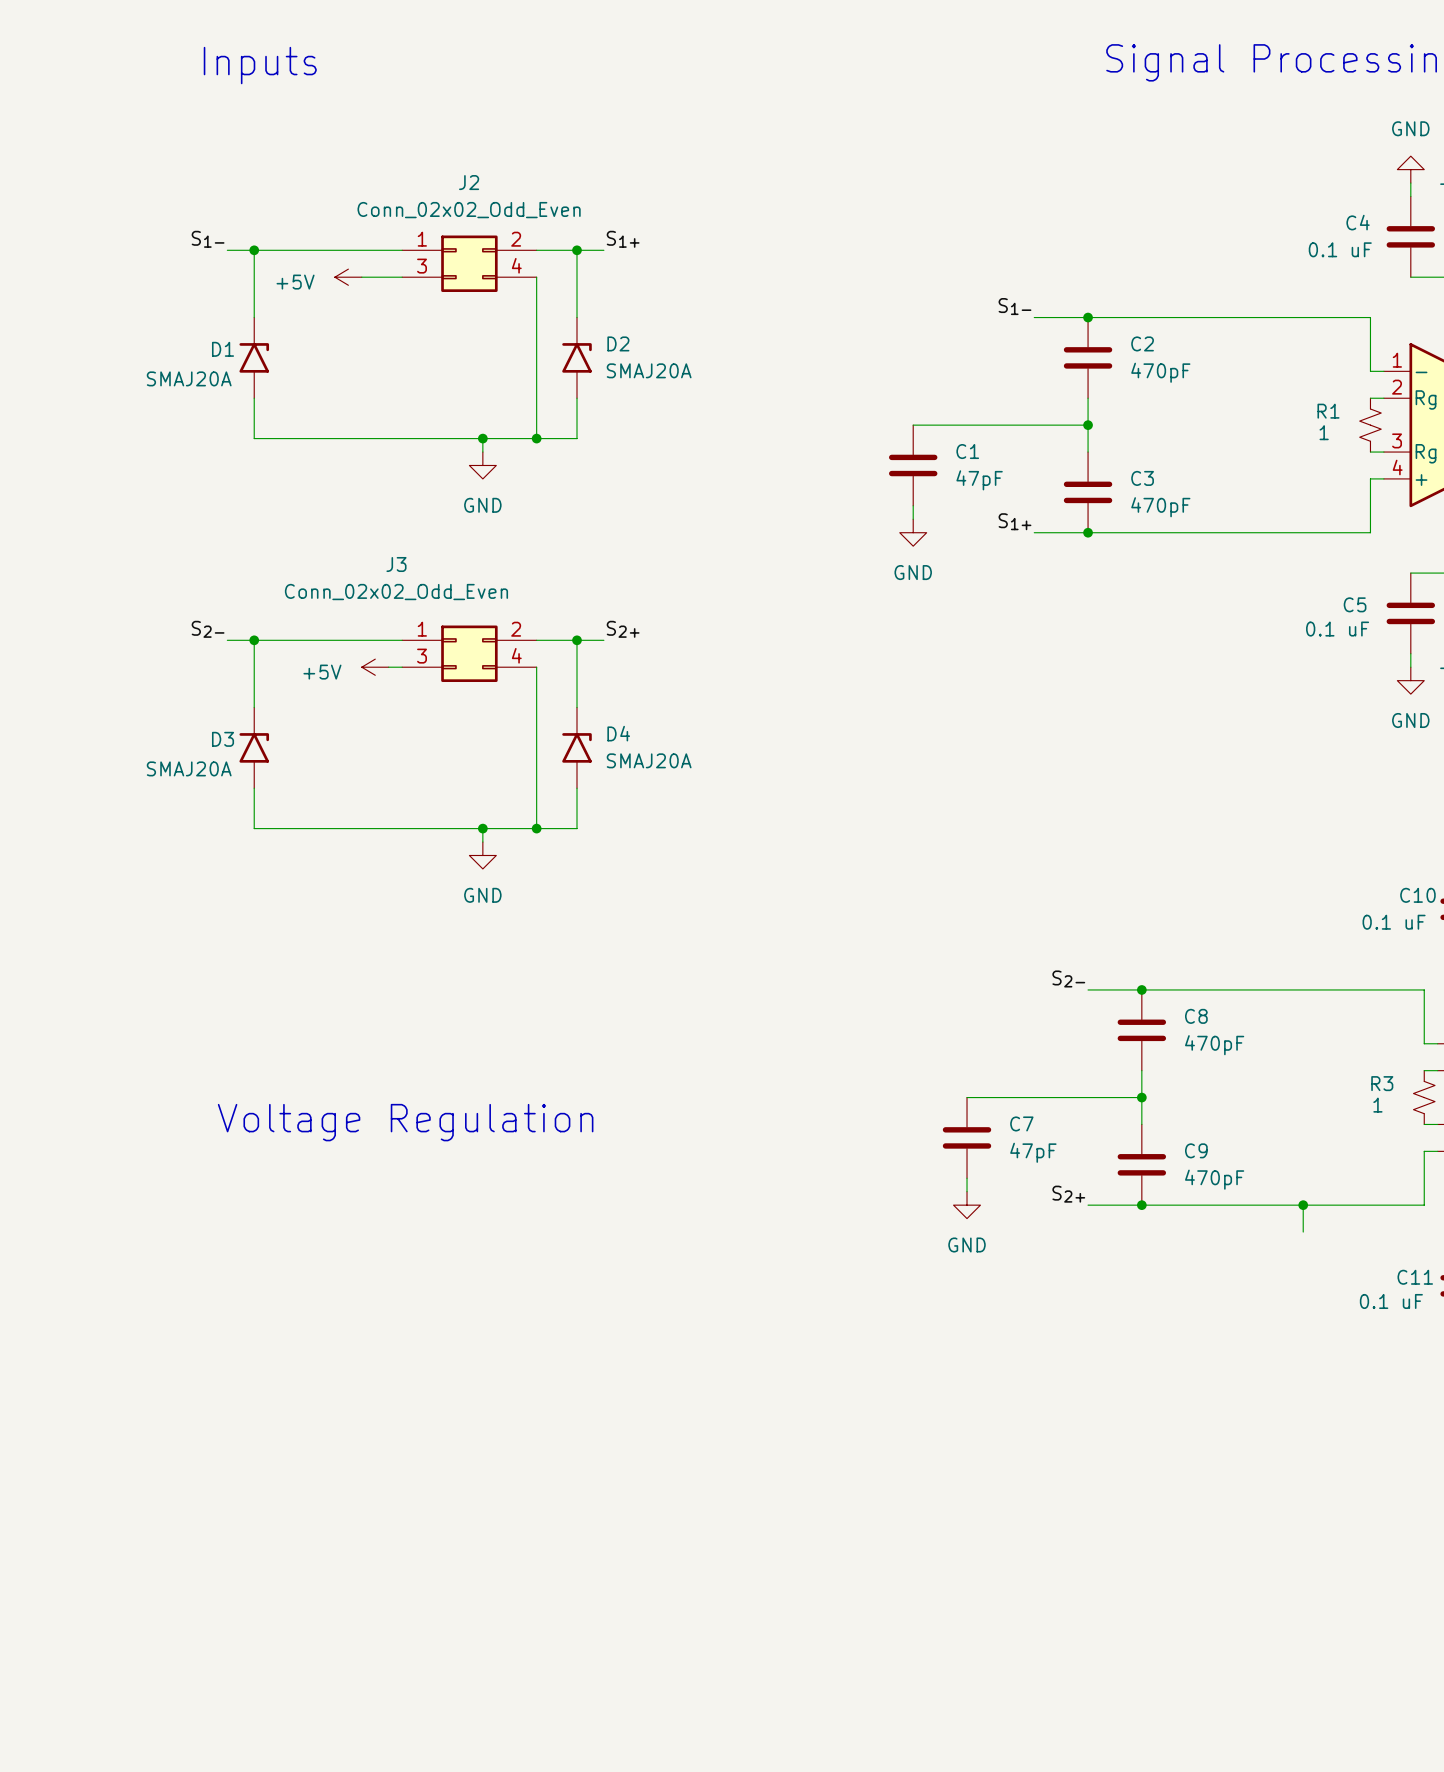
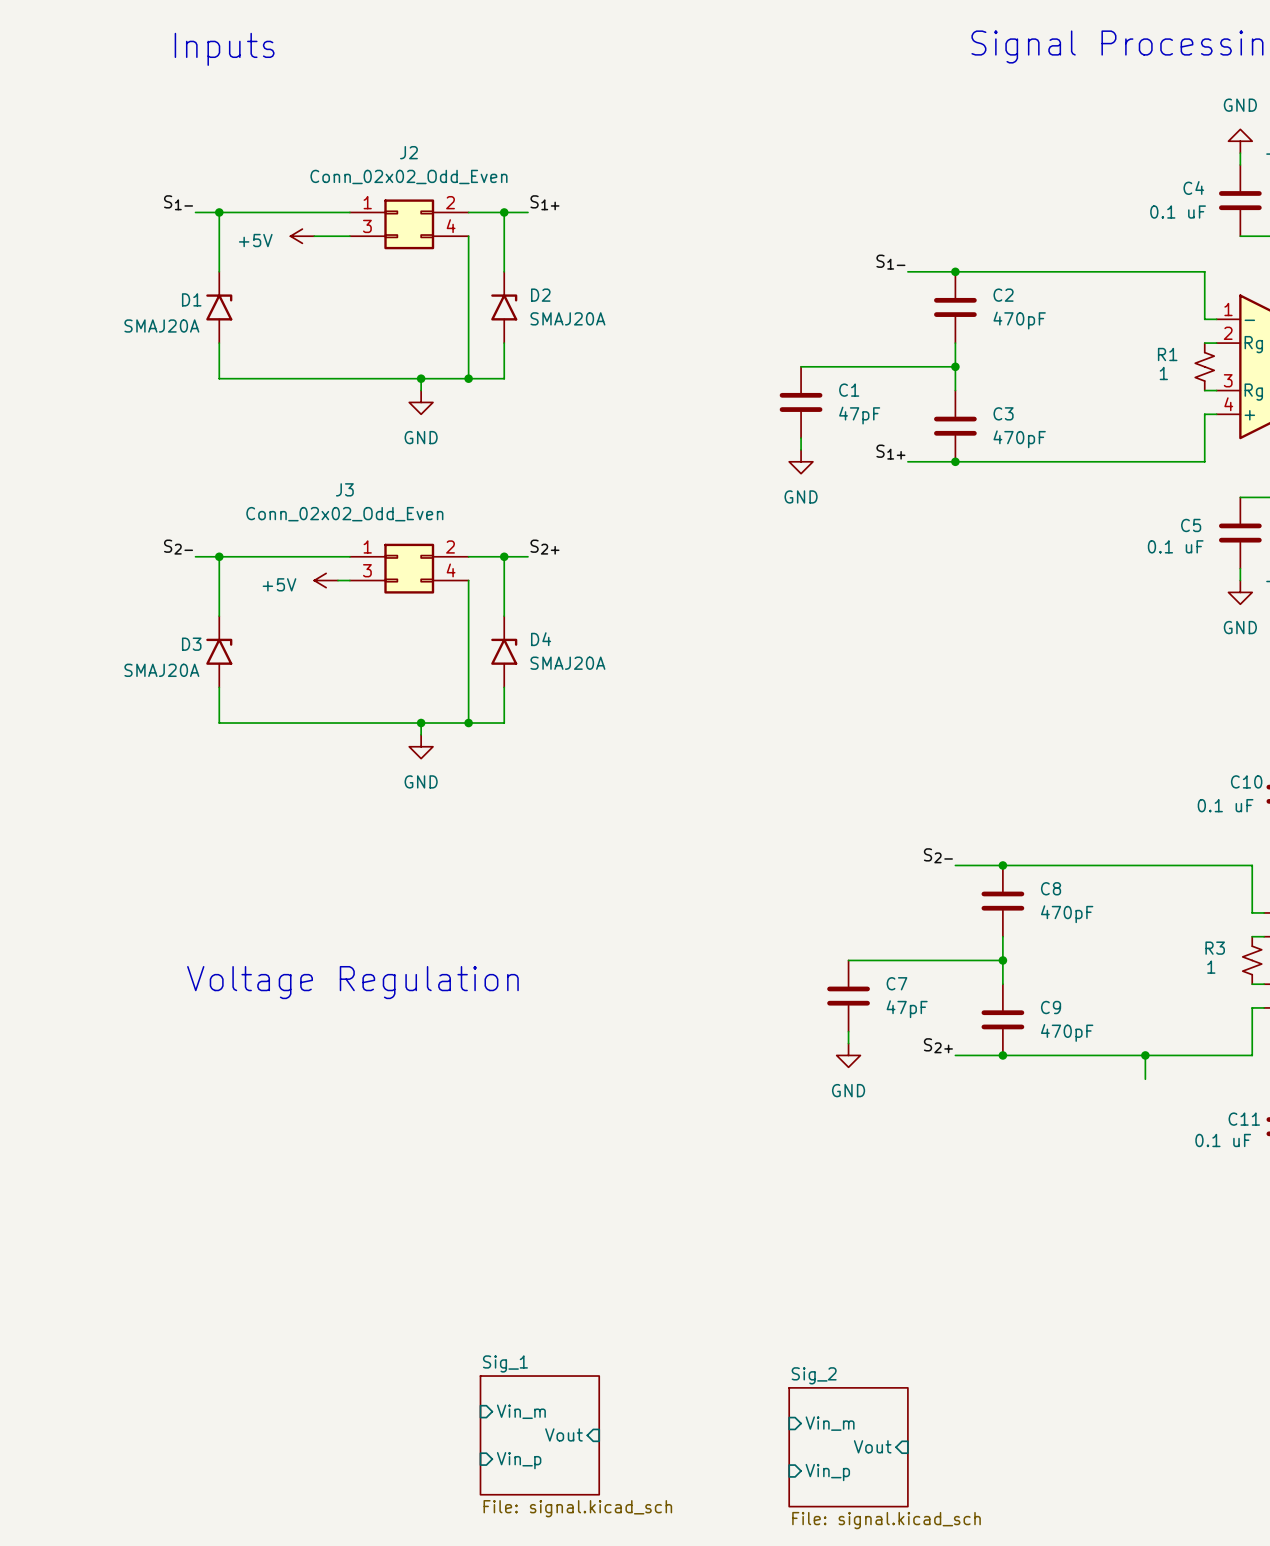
sheet pin: none -> Vin_m (521, 1411)
sheet pin: none -> Vin_m (830, 1423)
sheet Sig_1: none -> File: signal.kicad_sch (539, 1435)
sheet pin: none -> Vout (563, 1434)
sheet Sig_2: none -> File: signal.kicad_sch (848, 1447)
sheet pin: none -> Vout (872, 1446)
sheet pin: none -> Vin_p (519, 1460)
sheet pin: none -> Vin_p (827, 1472)

